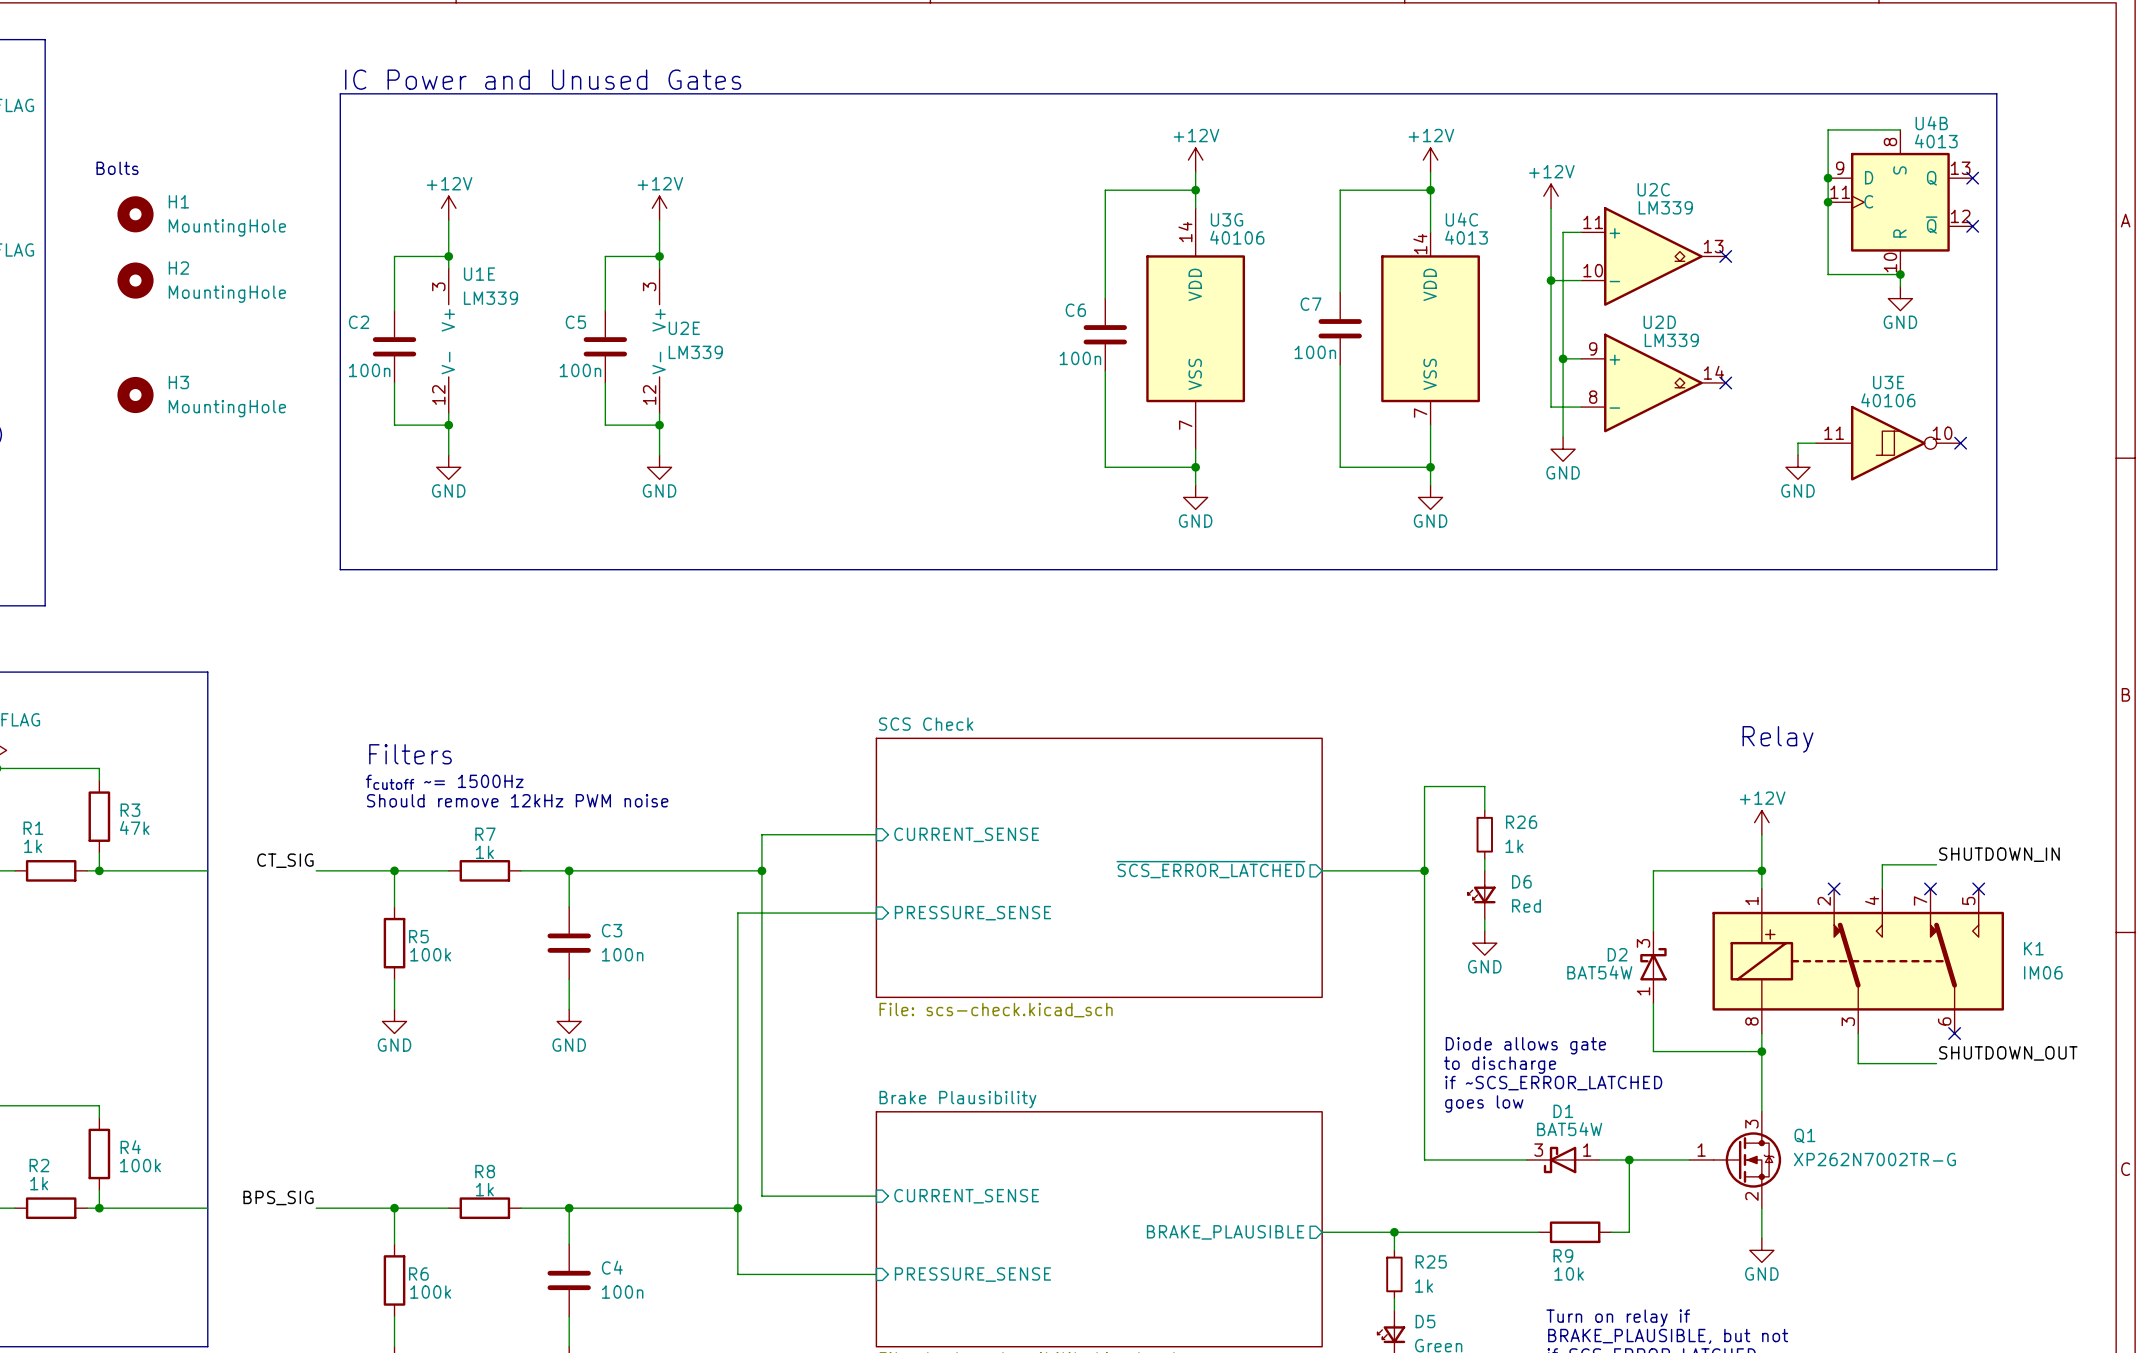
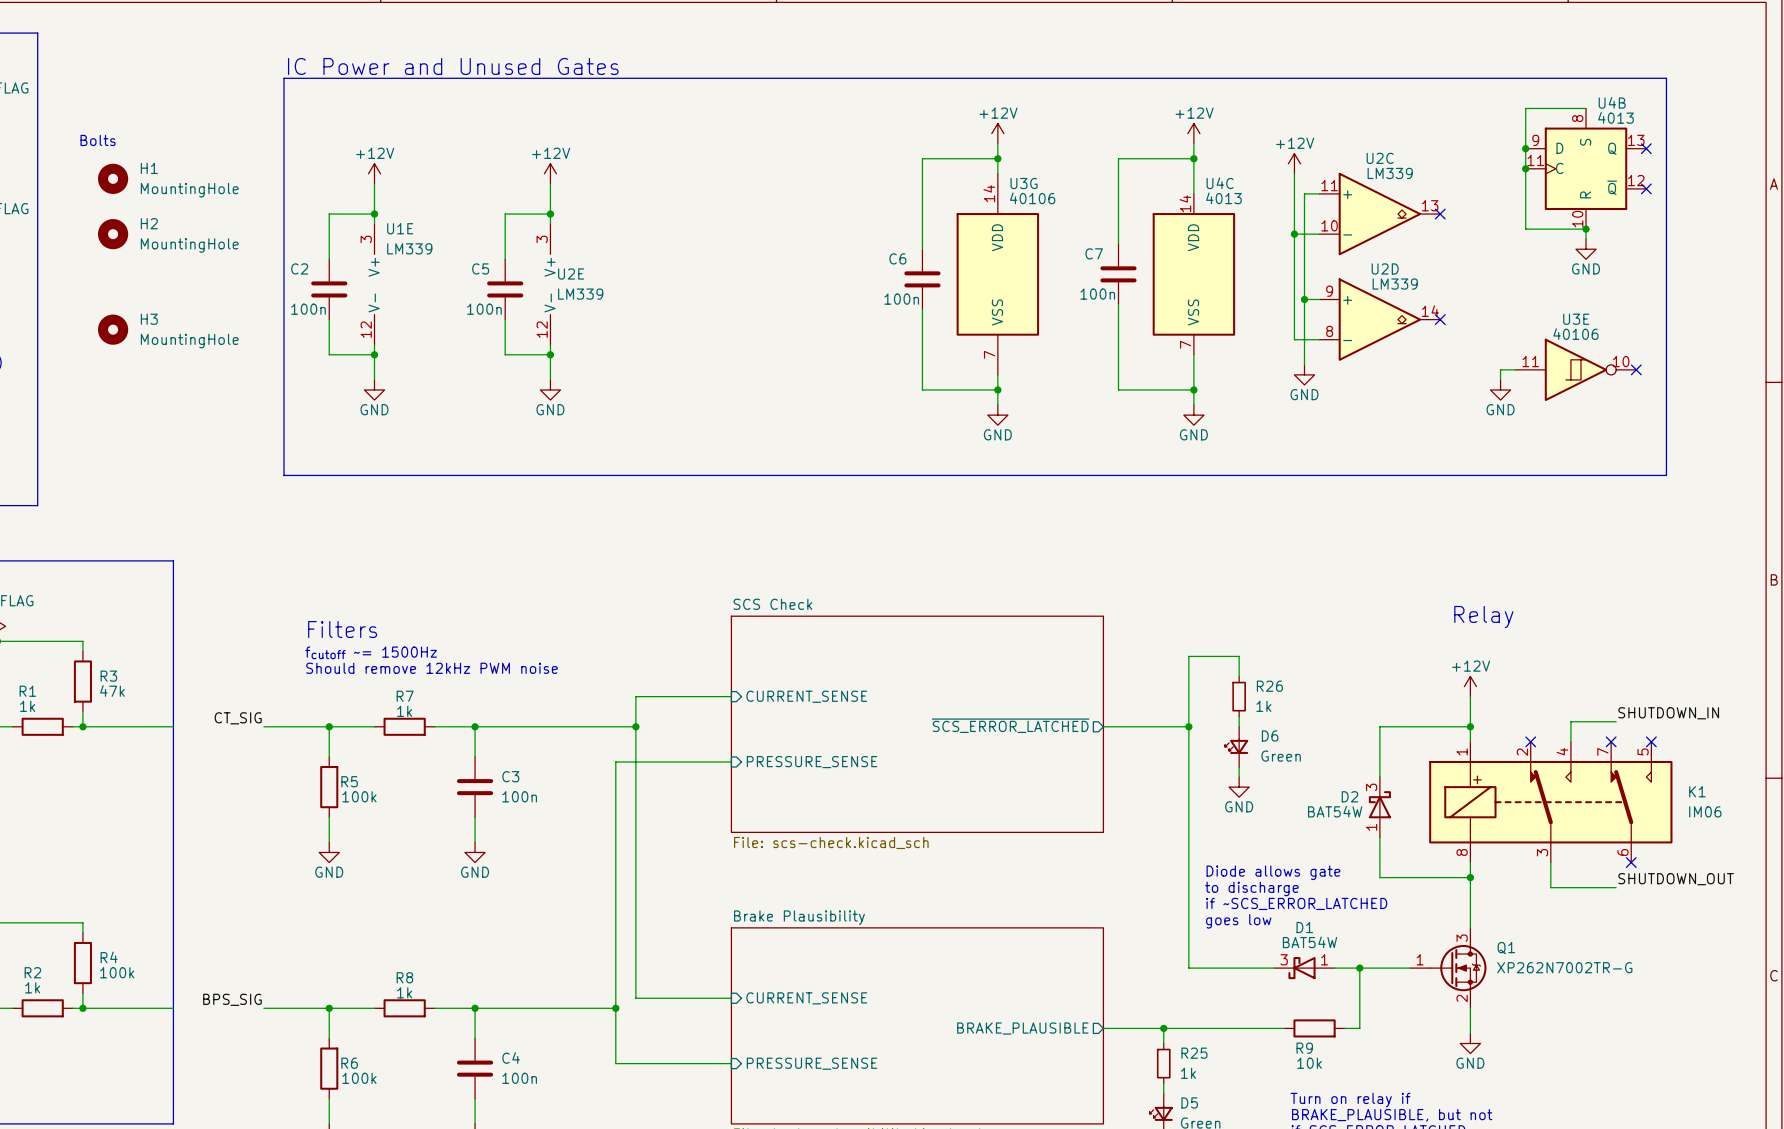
D6 value: Red (1526, 905) -> Green (1281, 756)

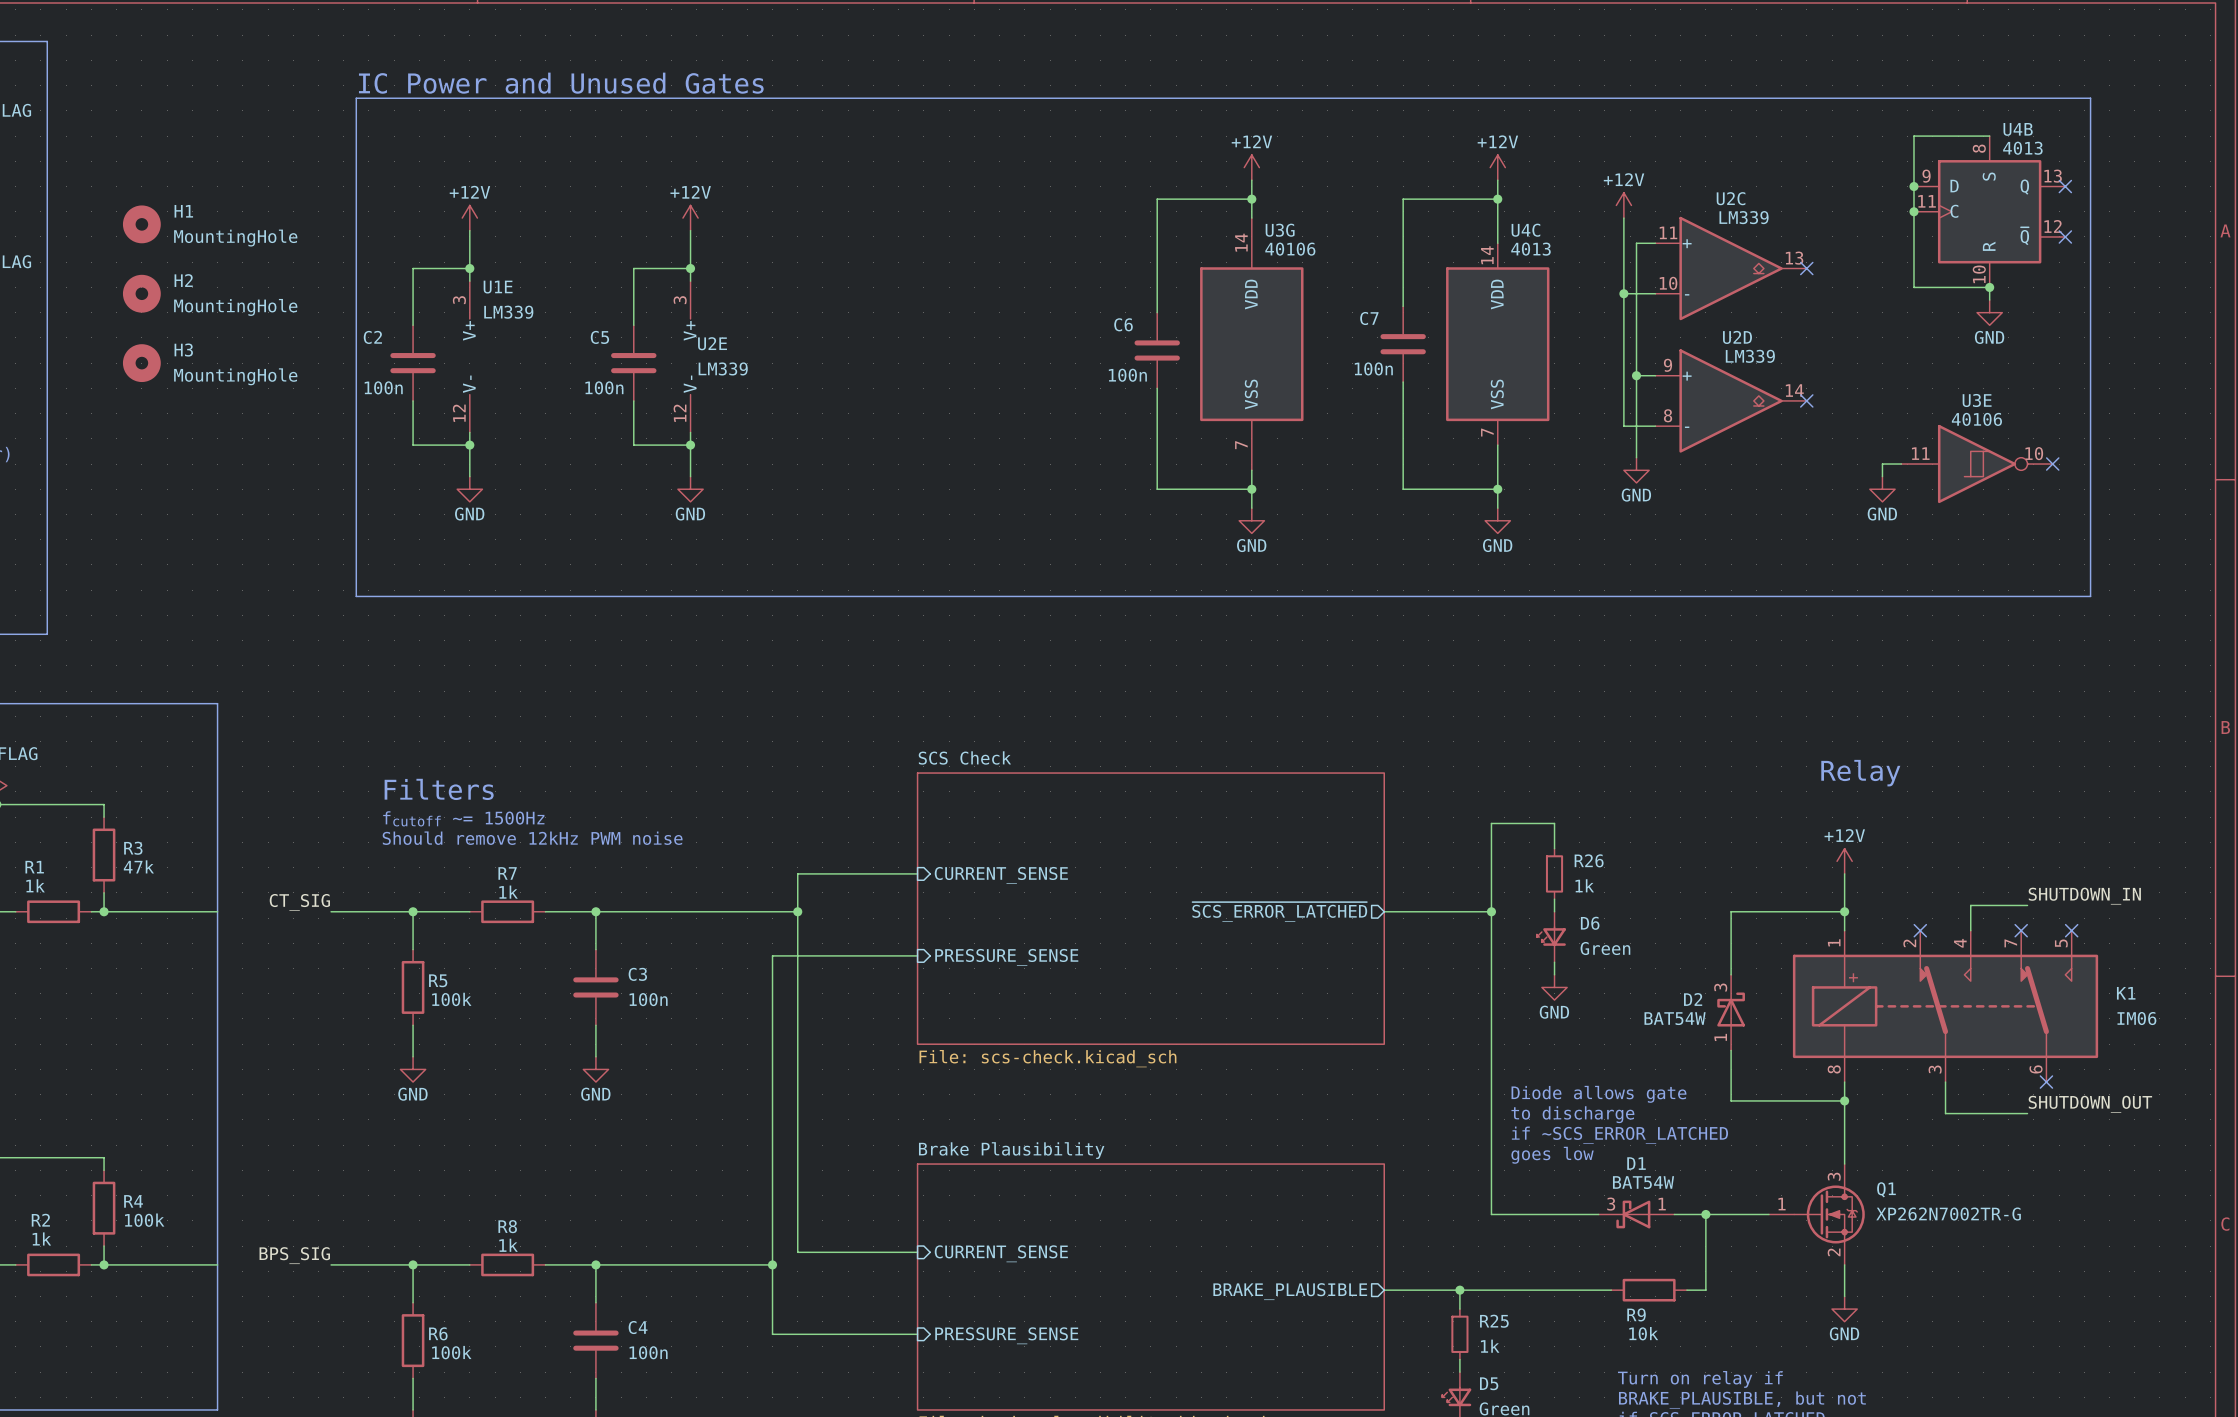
text: Bolts (98, 140) -> none
H3 position: (113, 329) -> (141, 363)

